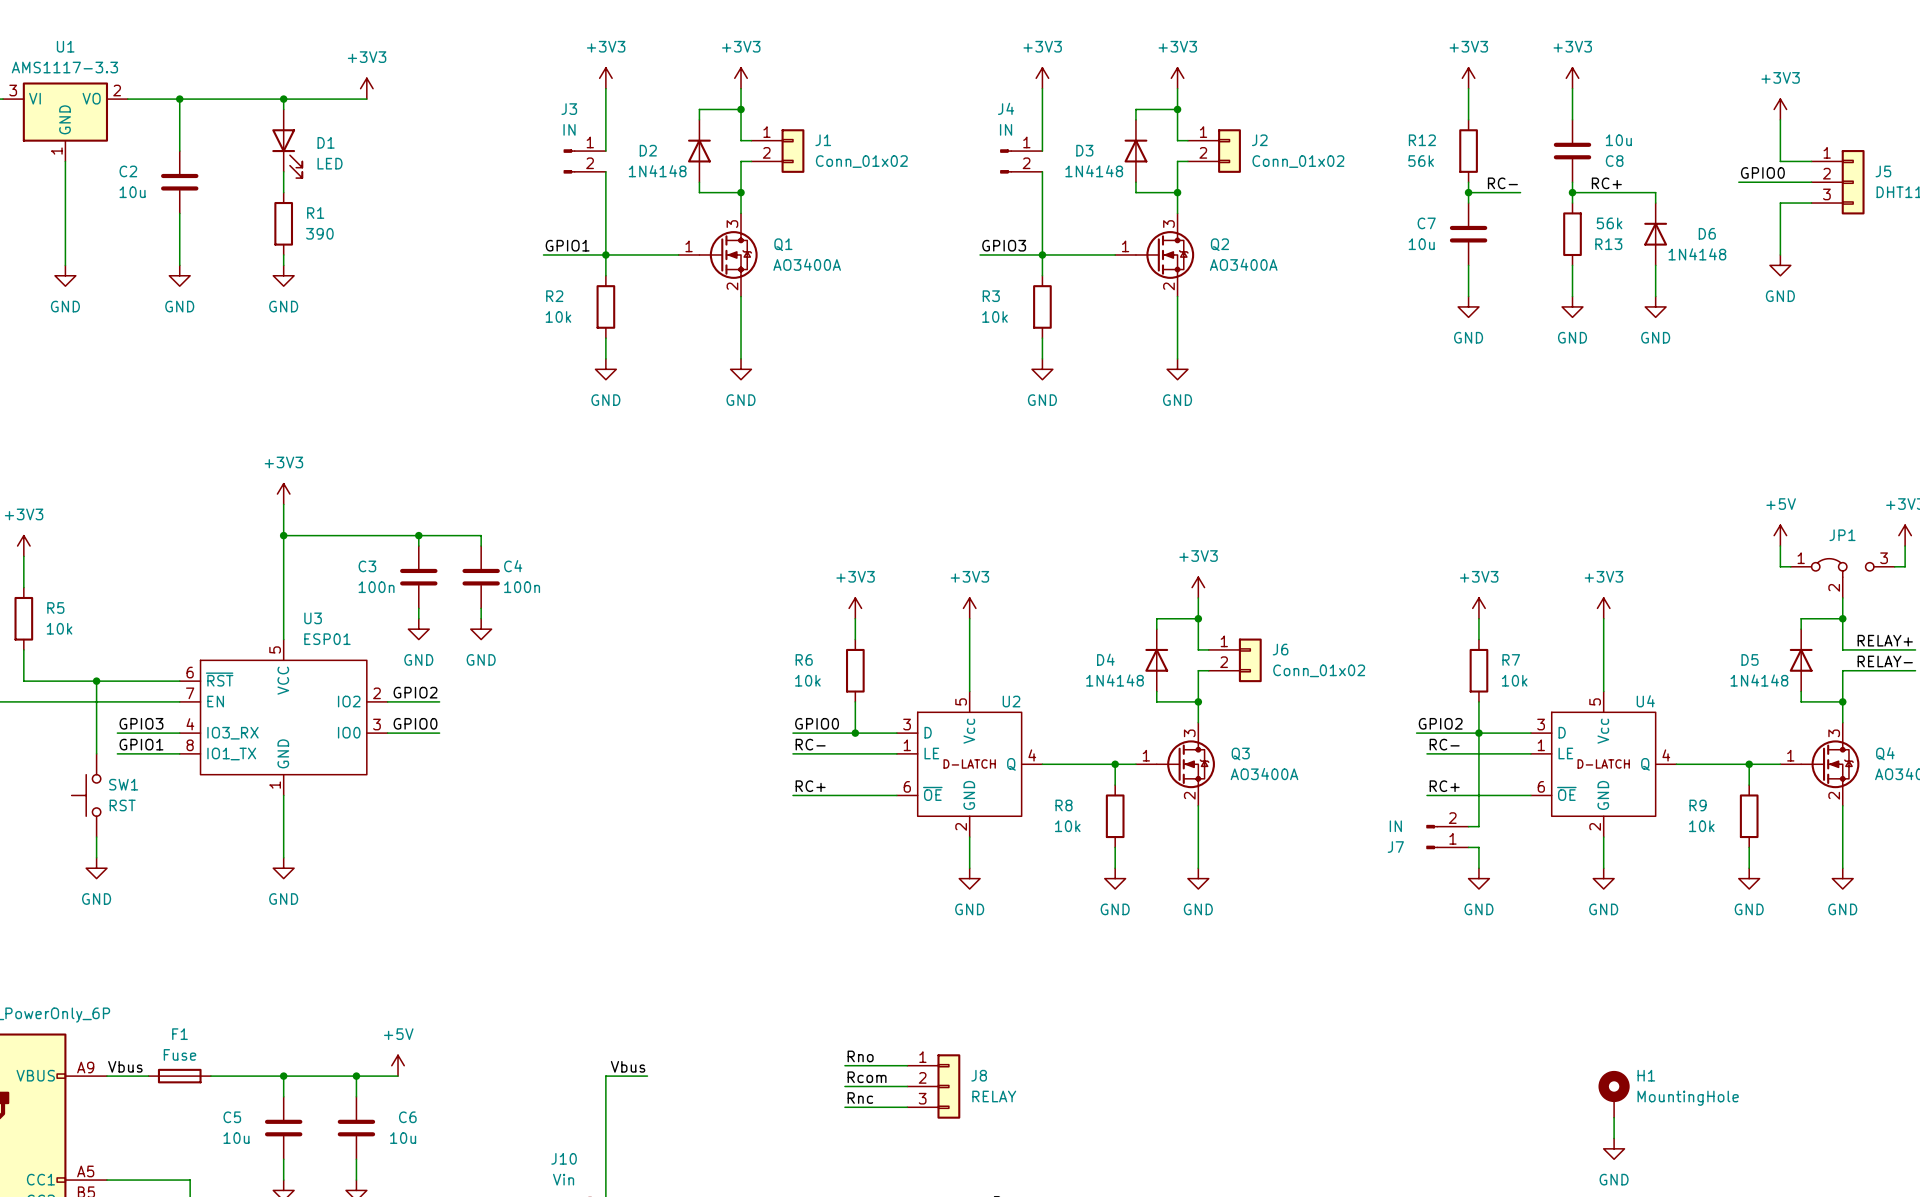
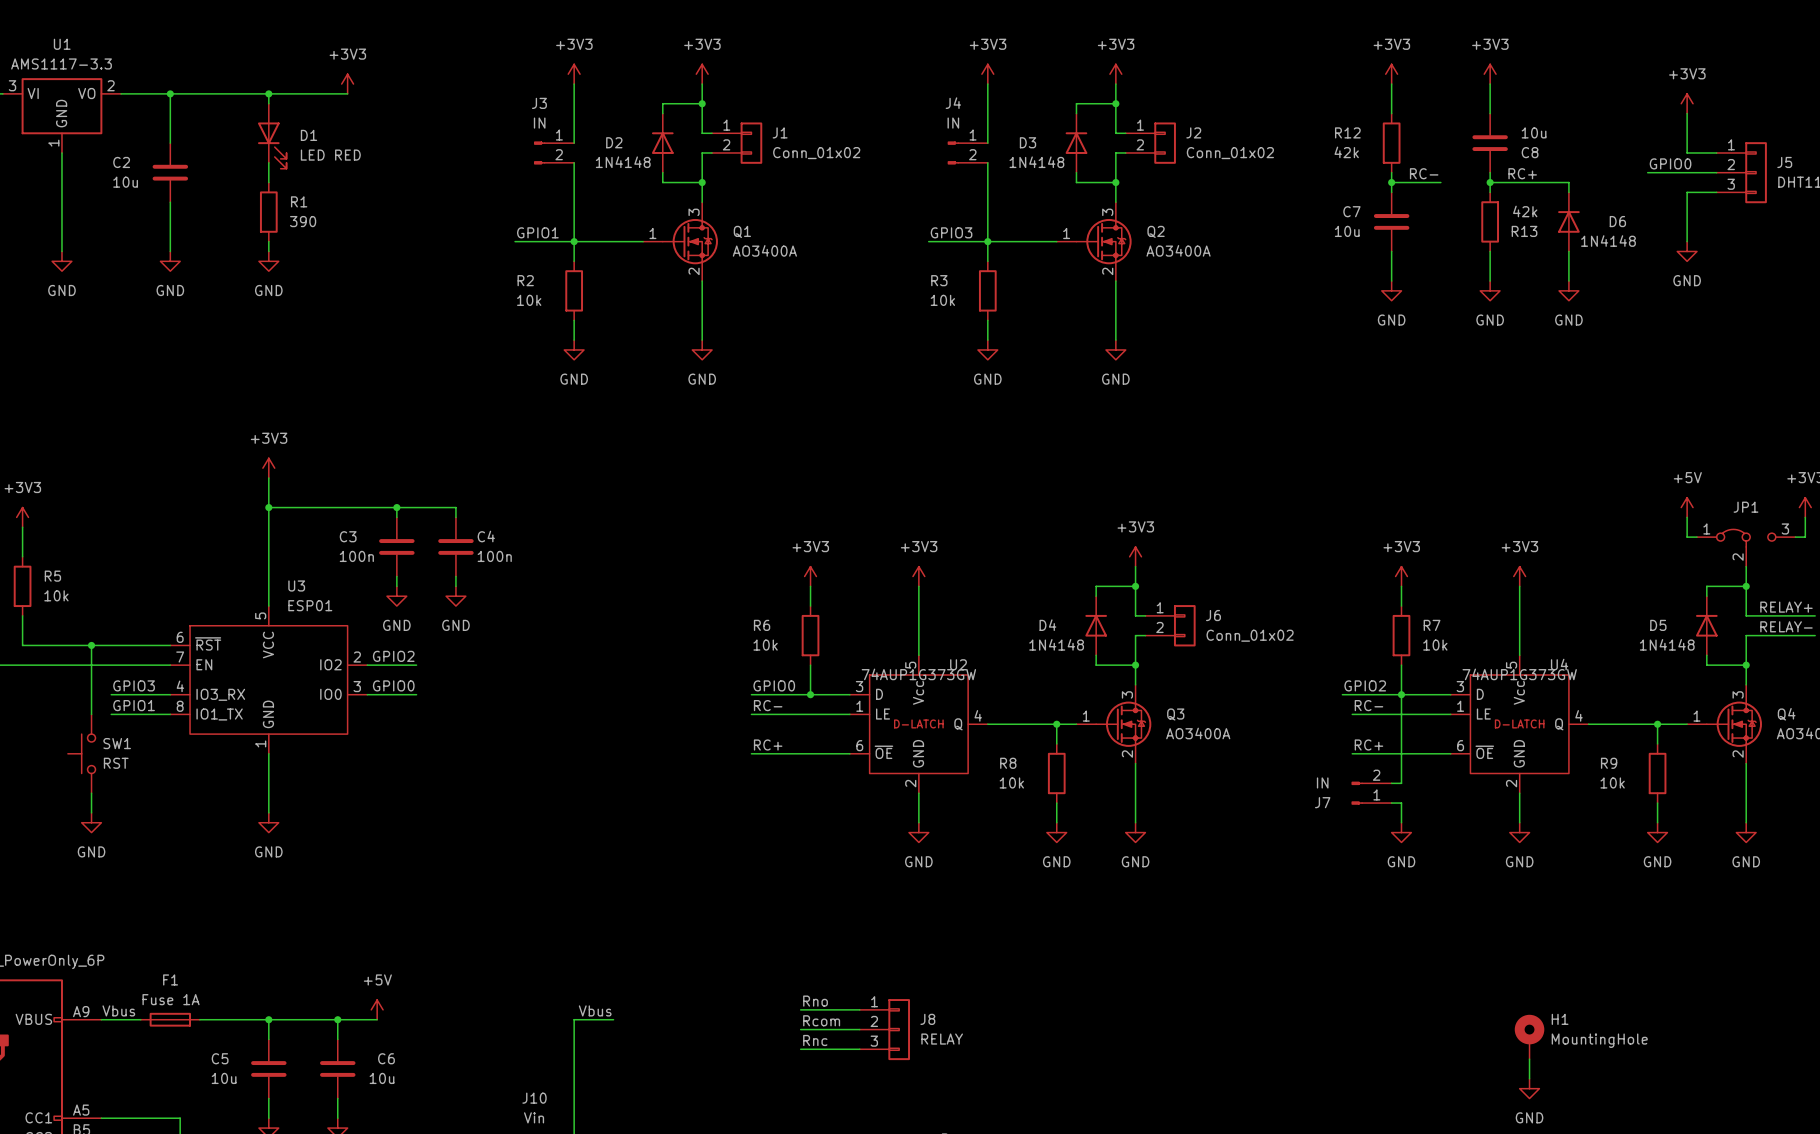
R12 value: 56k (1421, 161) -> 42k (1346, 152)
D1 value: LED (330, 163) -> LED RED (330, 155)
R13 value: 56k (1609, 223) -> 42k (1525, 211)
U2 value: none -> 74AUP1G373GW (918, 674)
U4 value: none -> 74AUP1G373GW (1519, 674)
F1 value: Fuse (179, 1054) -> Fuse 1A (171, 999)

